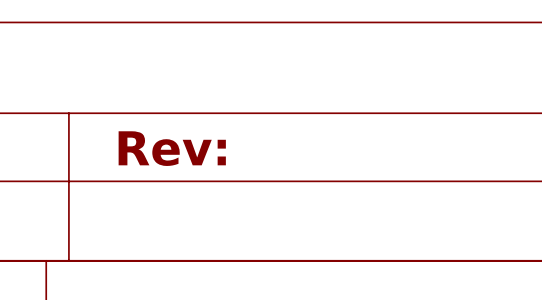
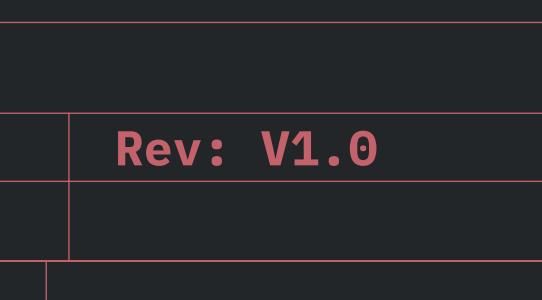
title block: Rev: (172, 148) -> Rev: V1.0 (247, 148)

